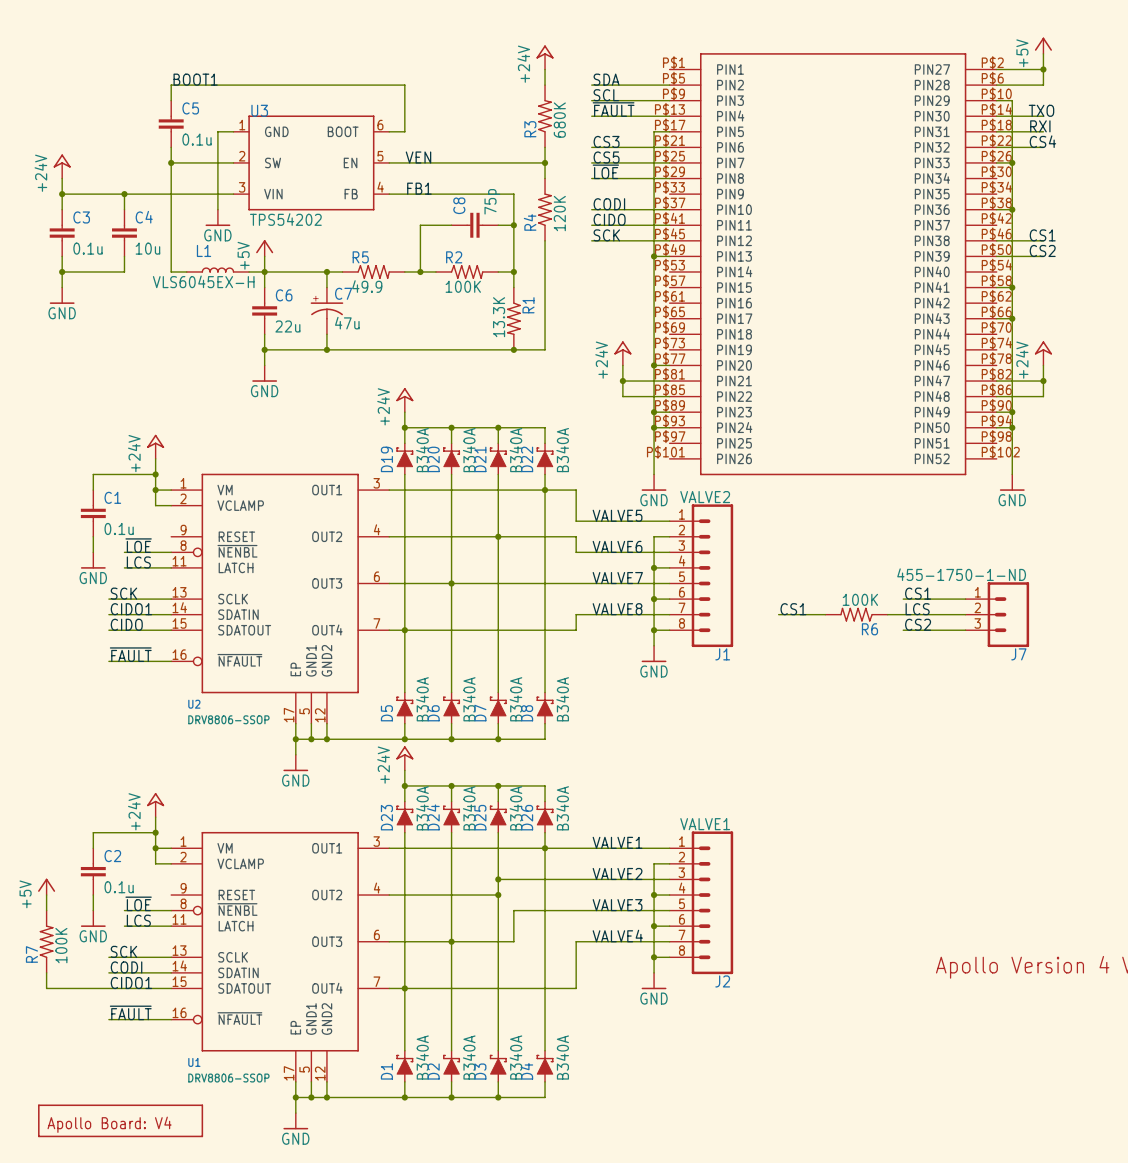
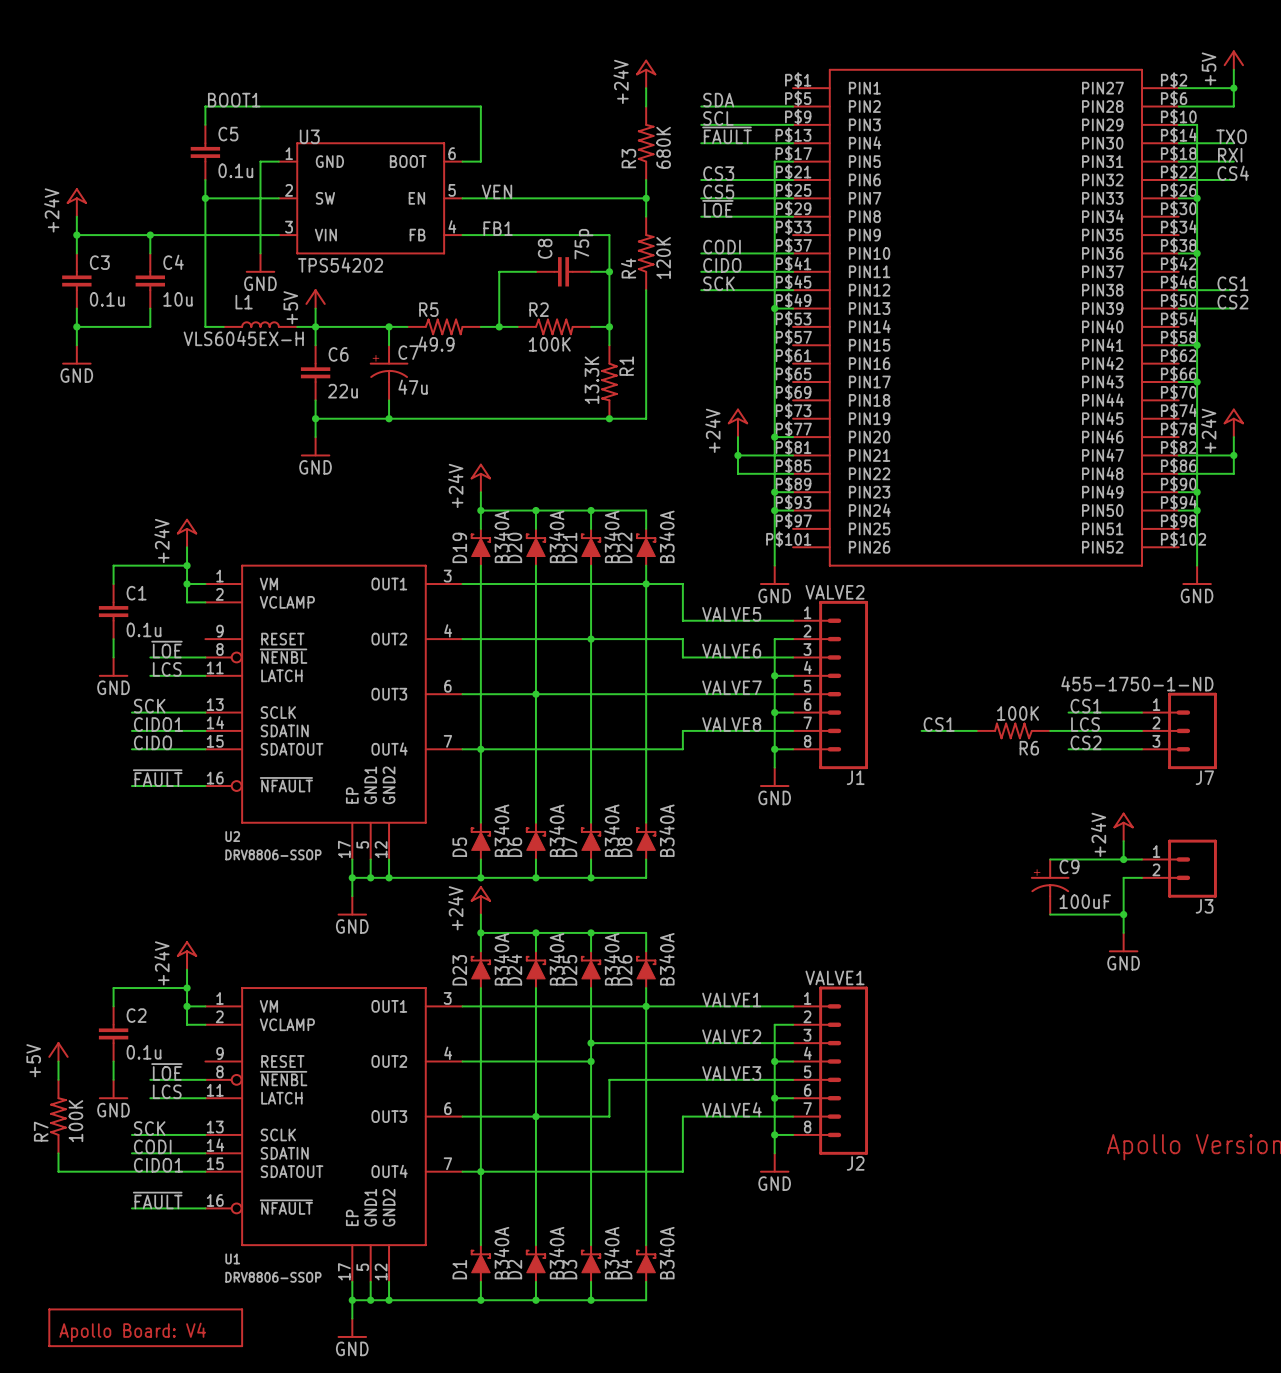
power symbol: none -> +24V (1123, 826)
wire: none -> (1123, 841) (1123, 859)
wire: none -> (1050, 859) (1142, 859)
junction: none -> (1123, 859)
J3: none -> (1179, 868)
wire: none -> (1142, 877) (1123, 877) (1123, 932)
C9: none -> 100uF (1050, 887)
wire: none -> (1050, 914) (1123, 914)
junction: none -> (1123, 914)
power symbol: none -> GND (1123, 942)

